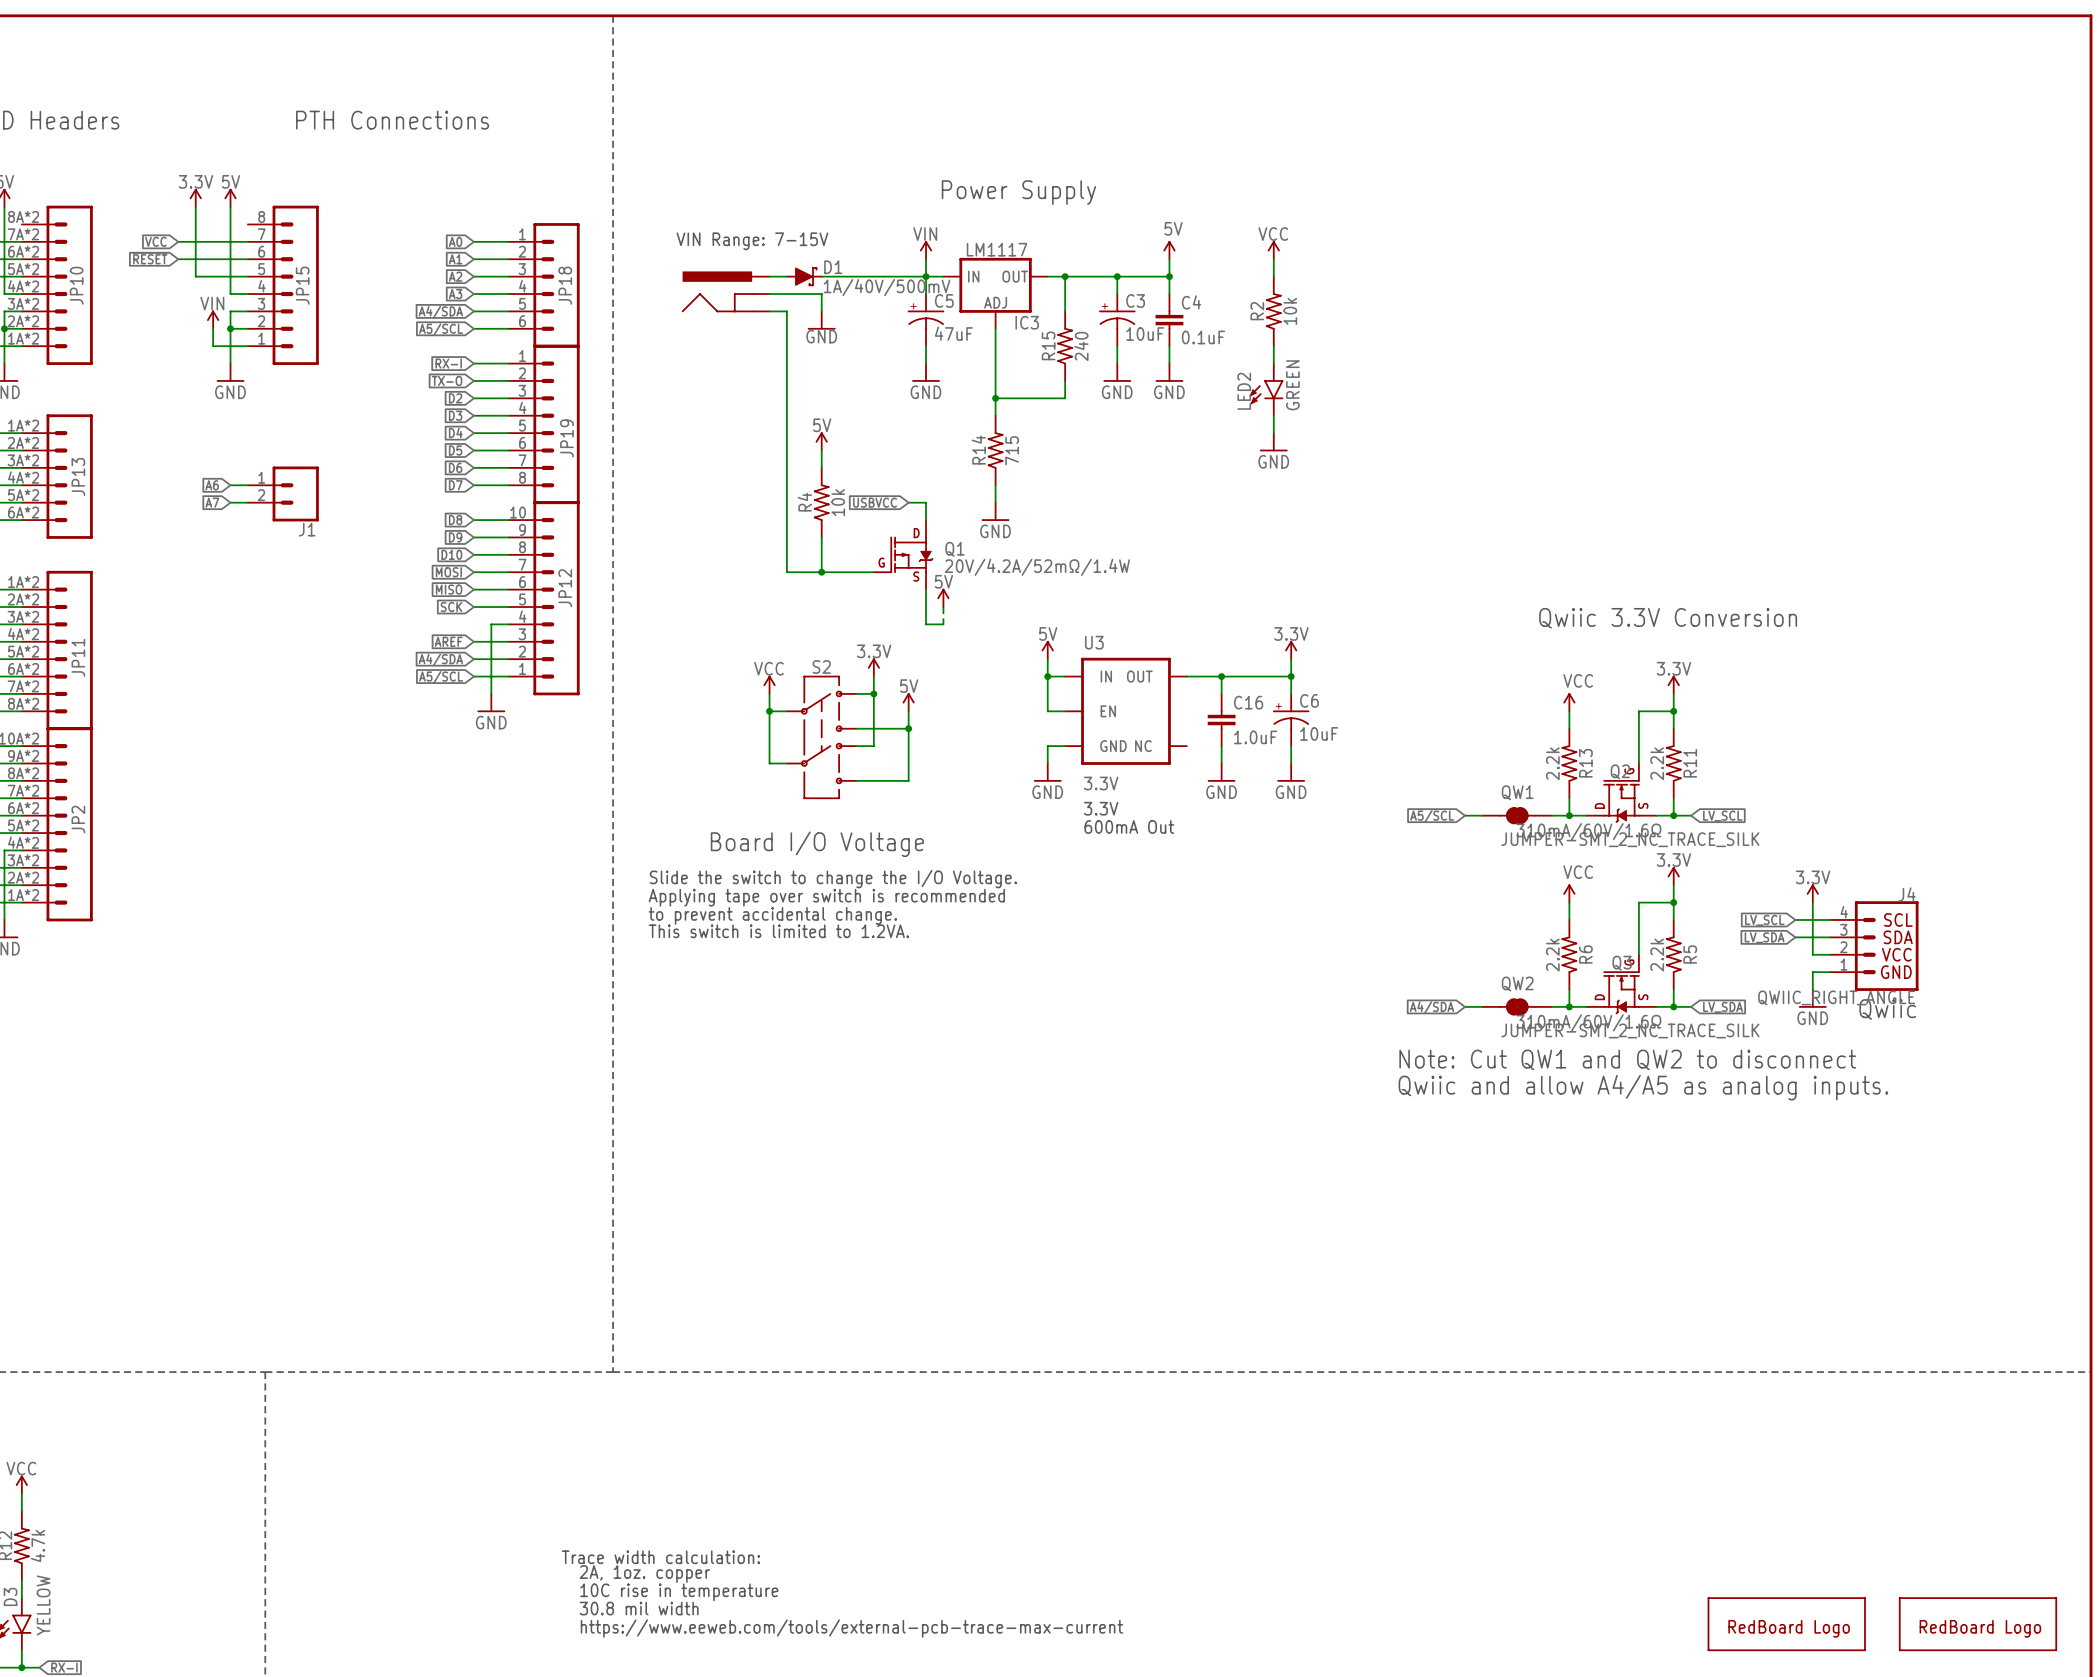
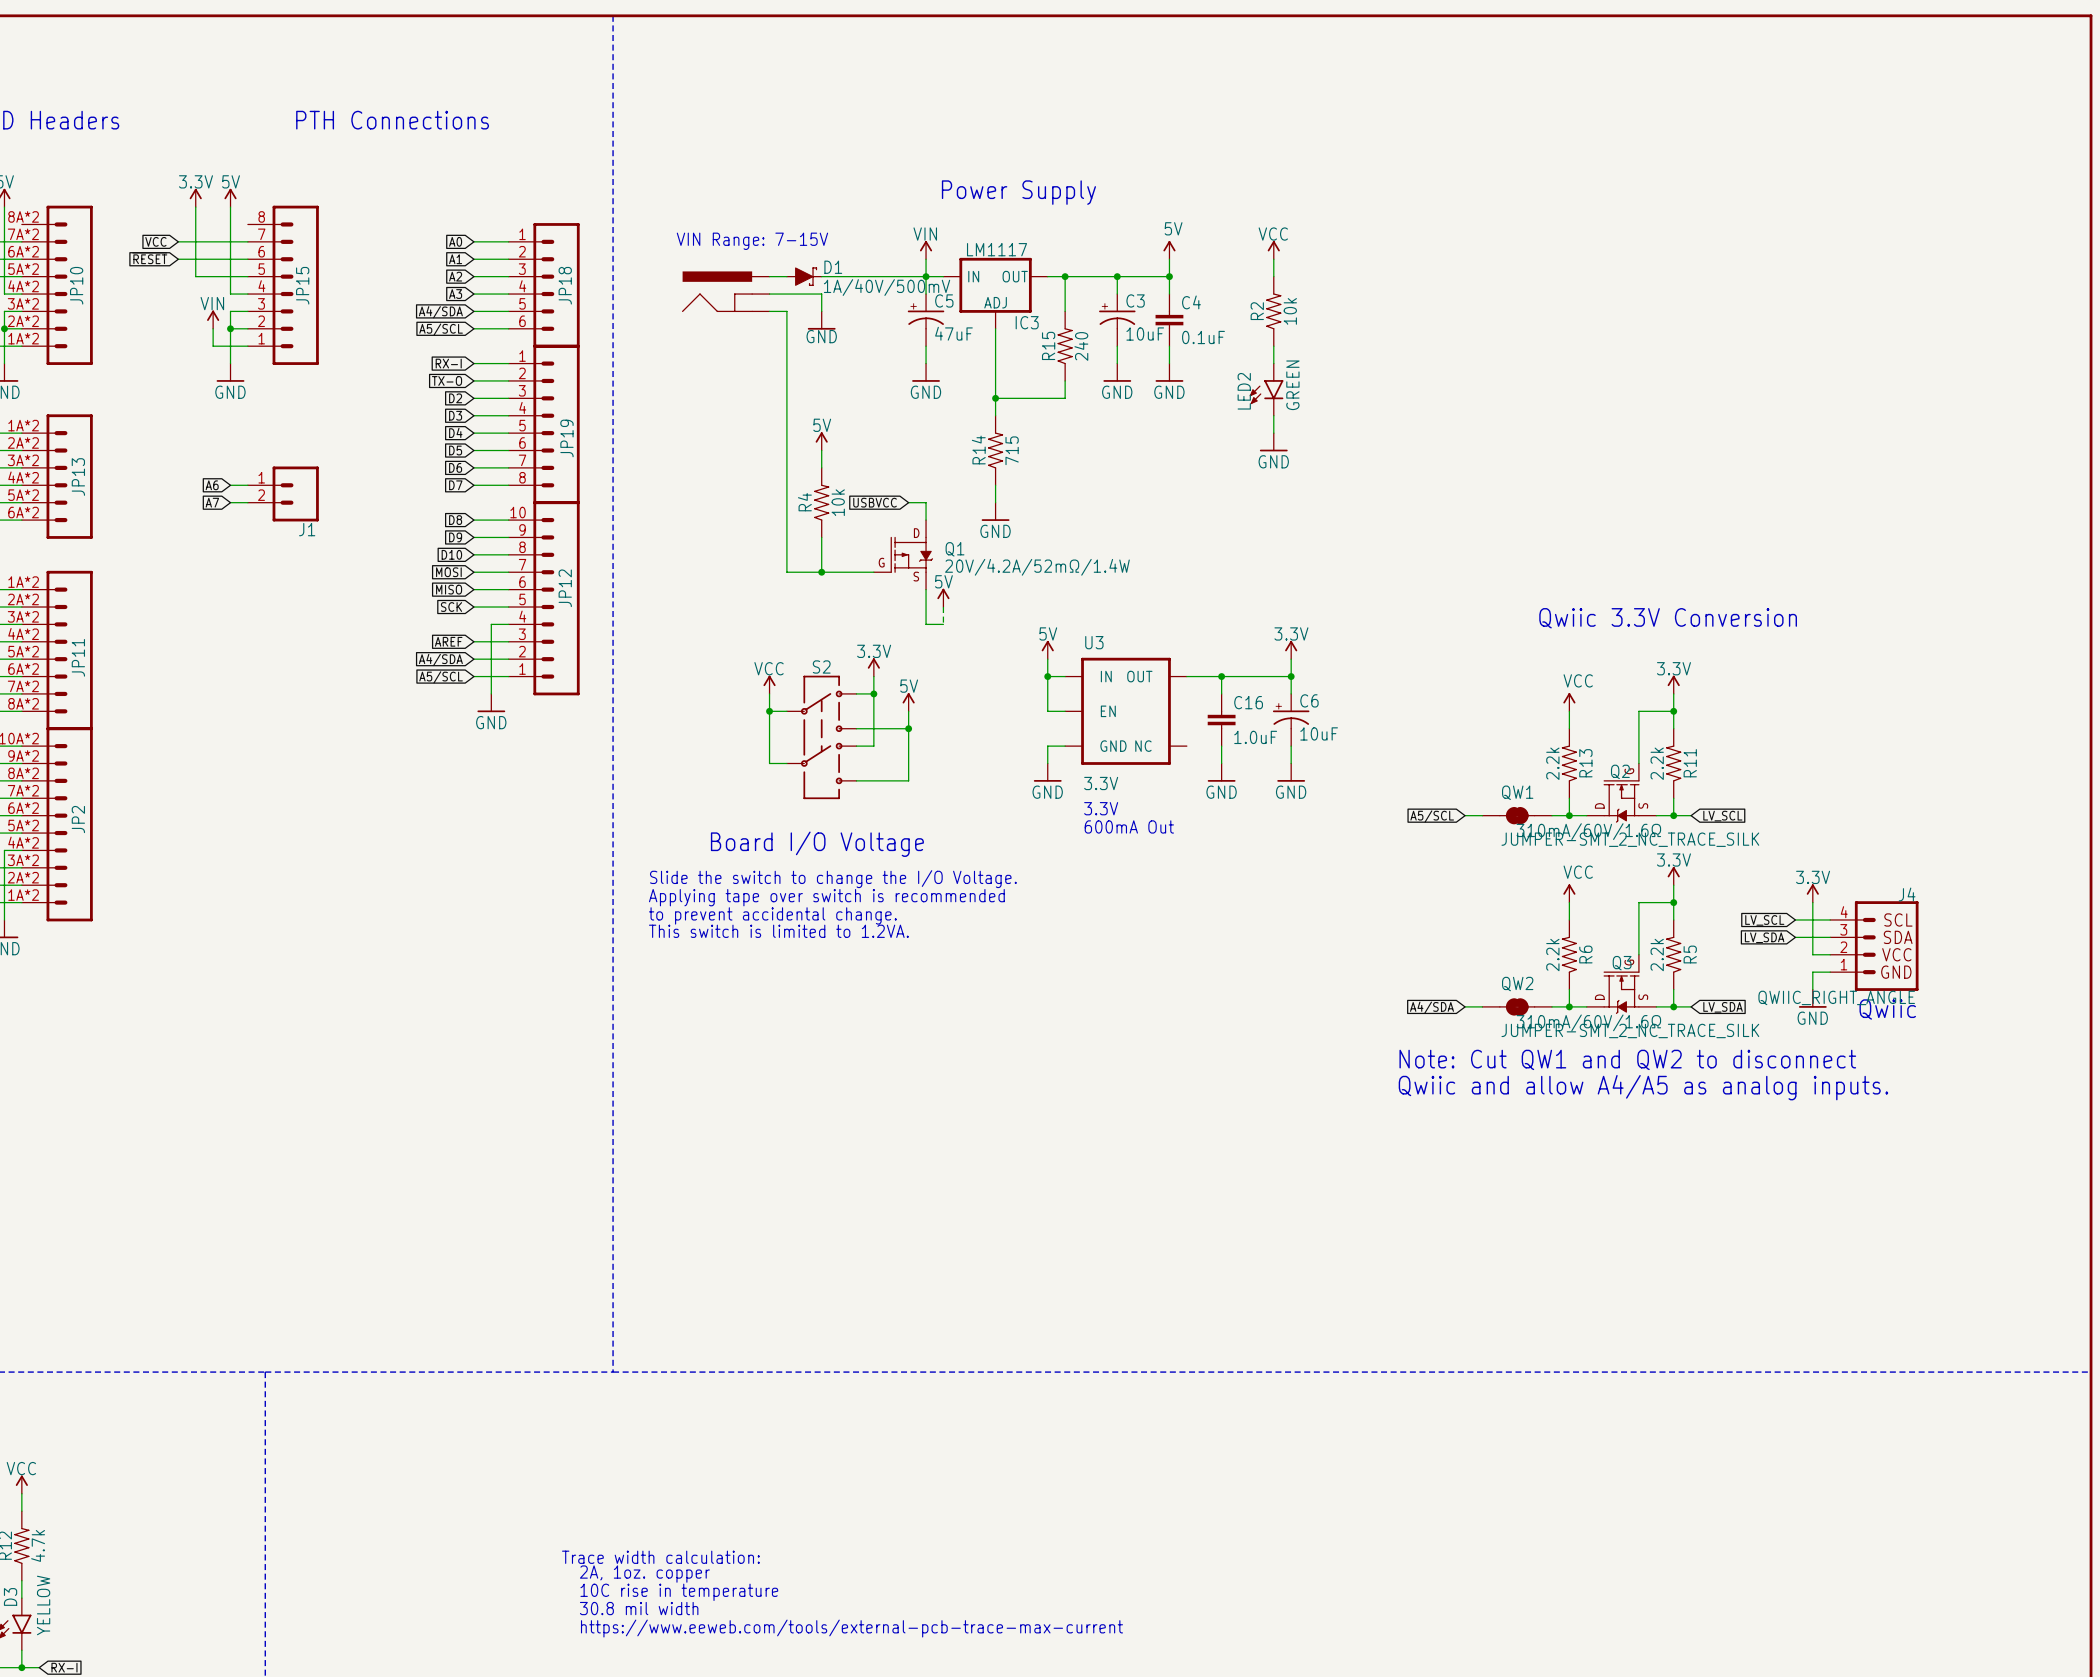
part: (1786, 1624) -> none
part: (1978, 1624) -> none

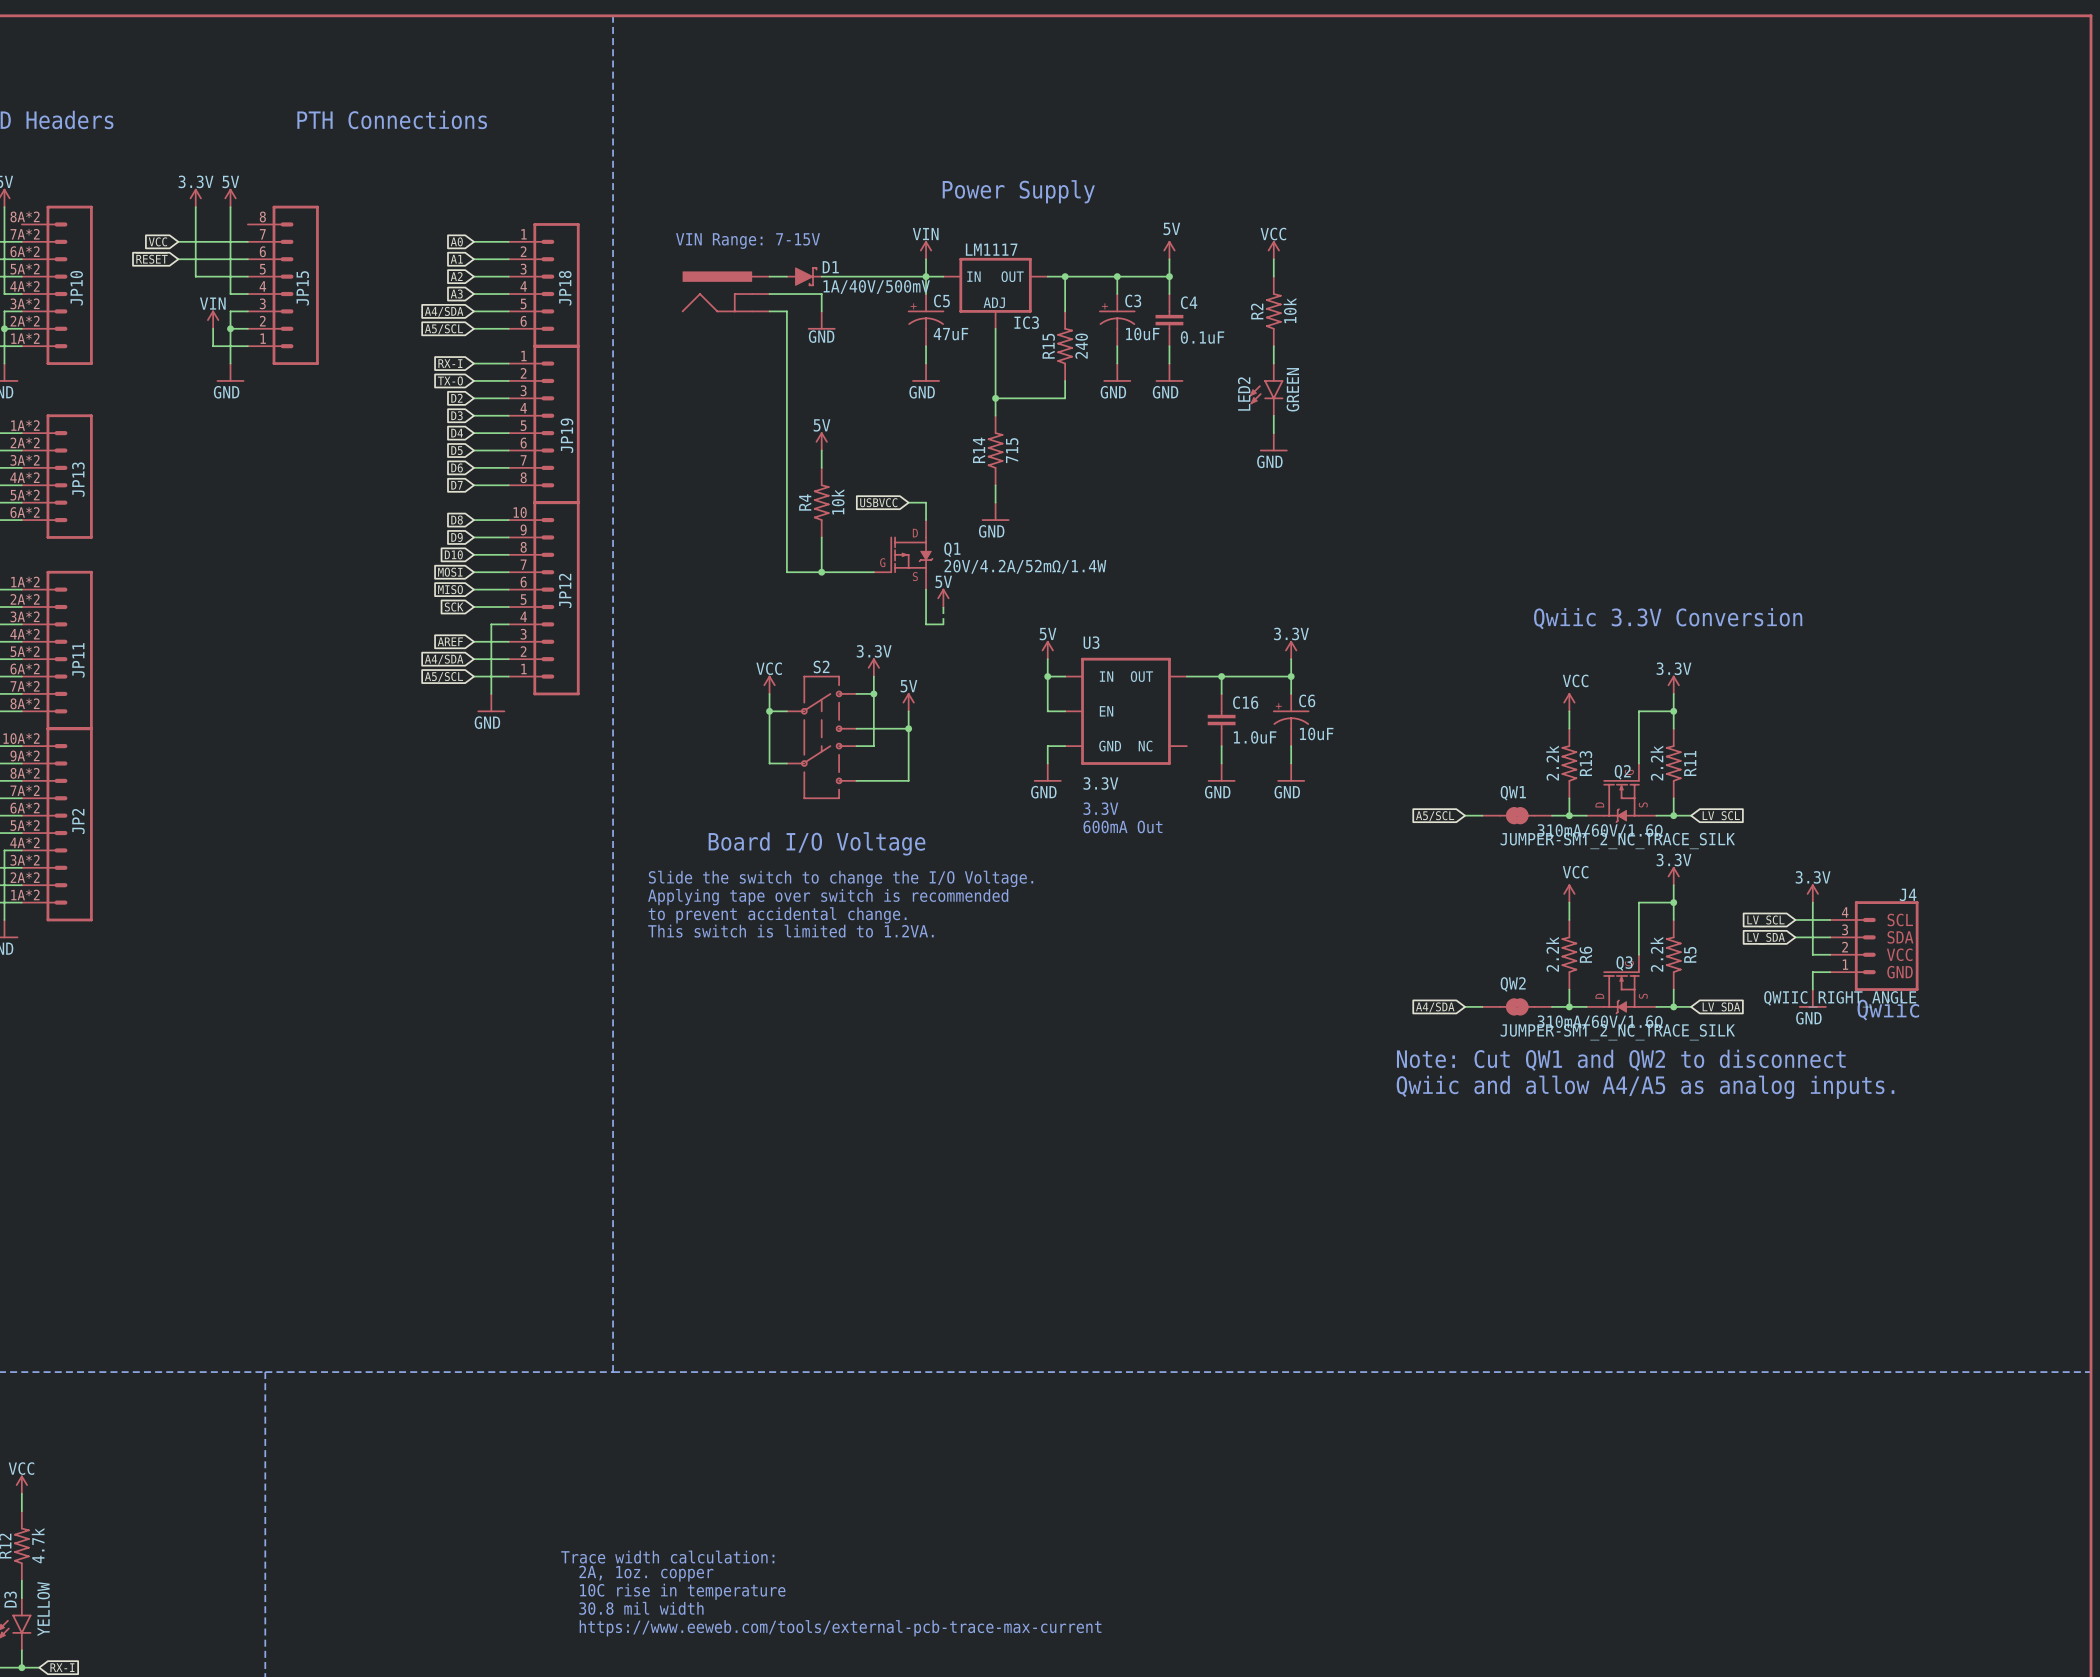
global label: A6 (212, 485) -> none
wire: (230, 485) (247, 485) -> none
J1: (283, 493) -> none
global label: A7 (212, 502) -> none
wire: (230, 502) (247, 502) -> none

